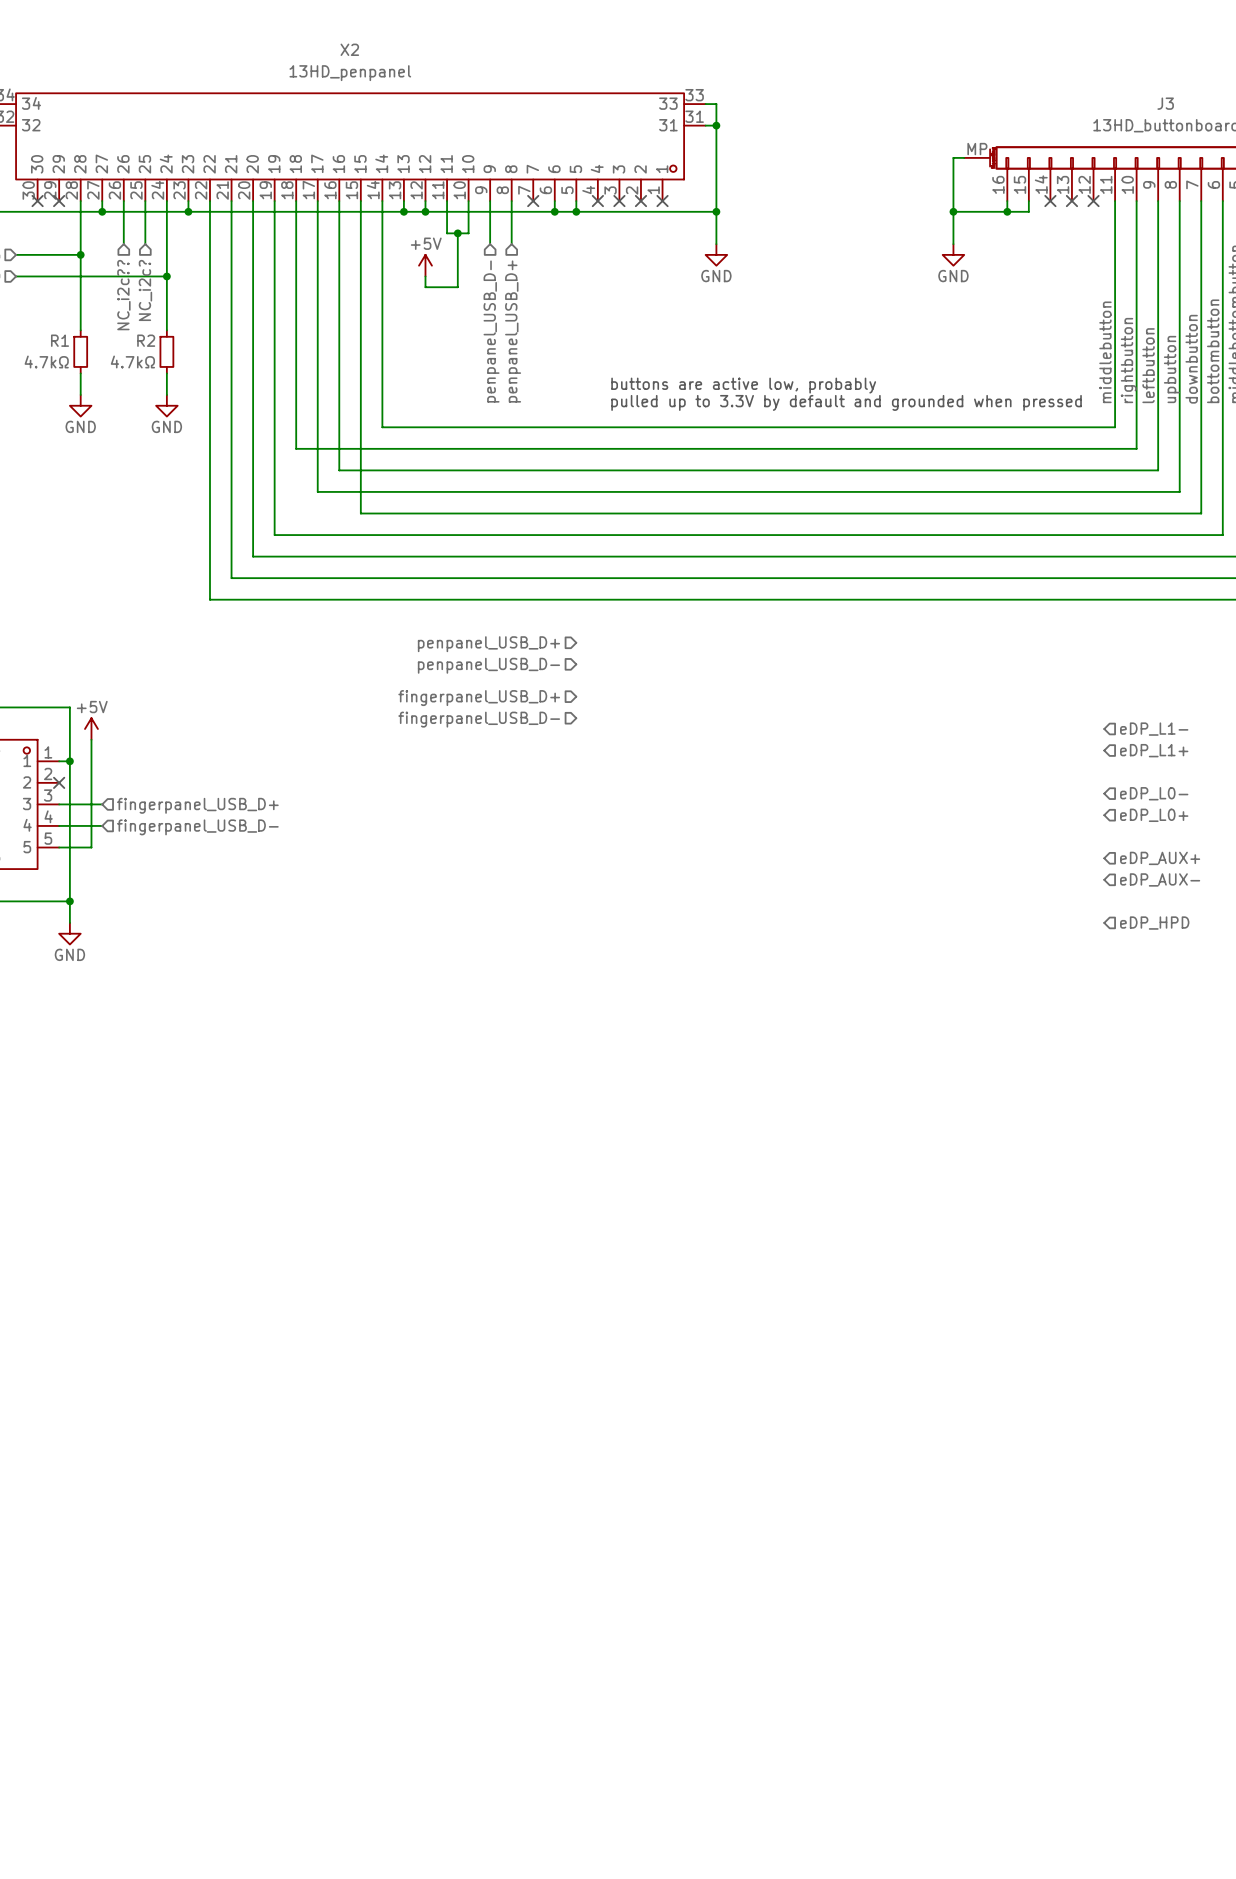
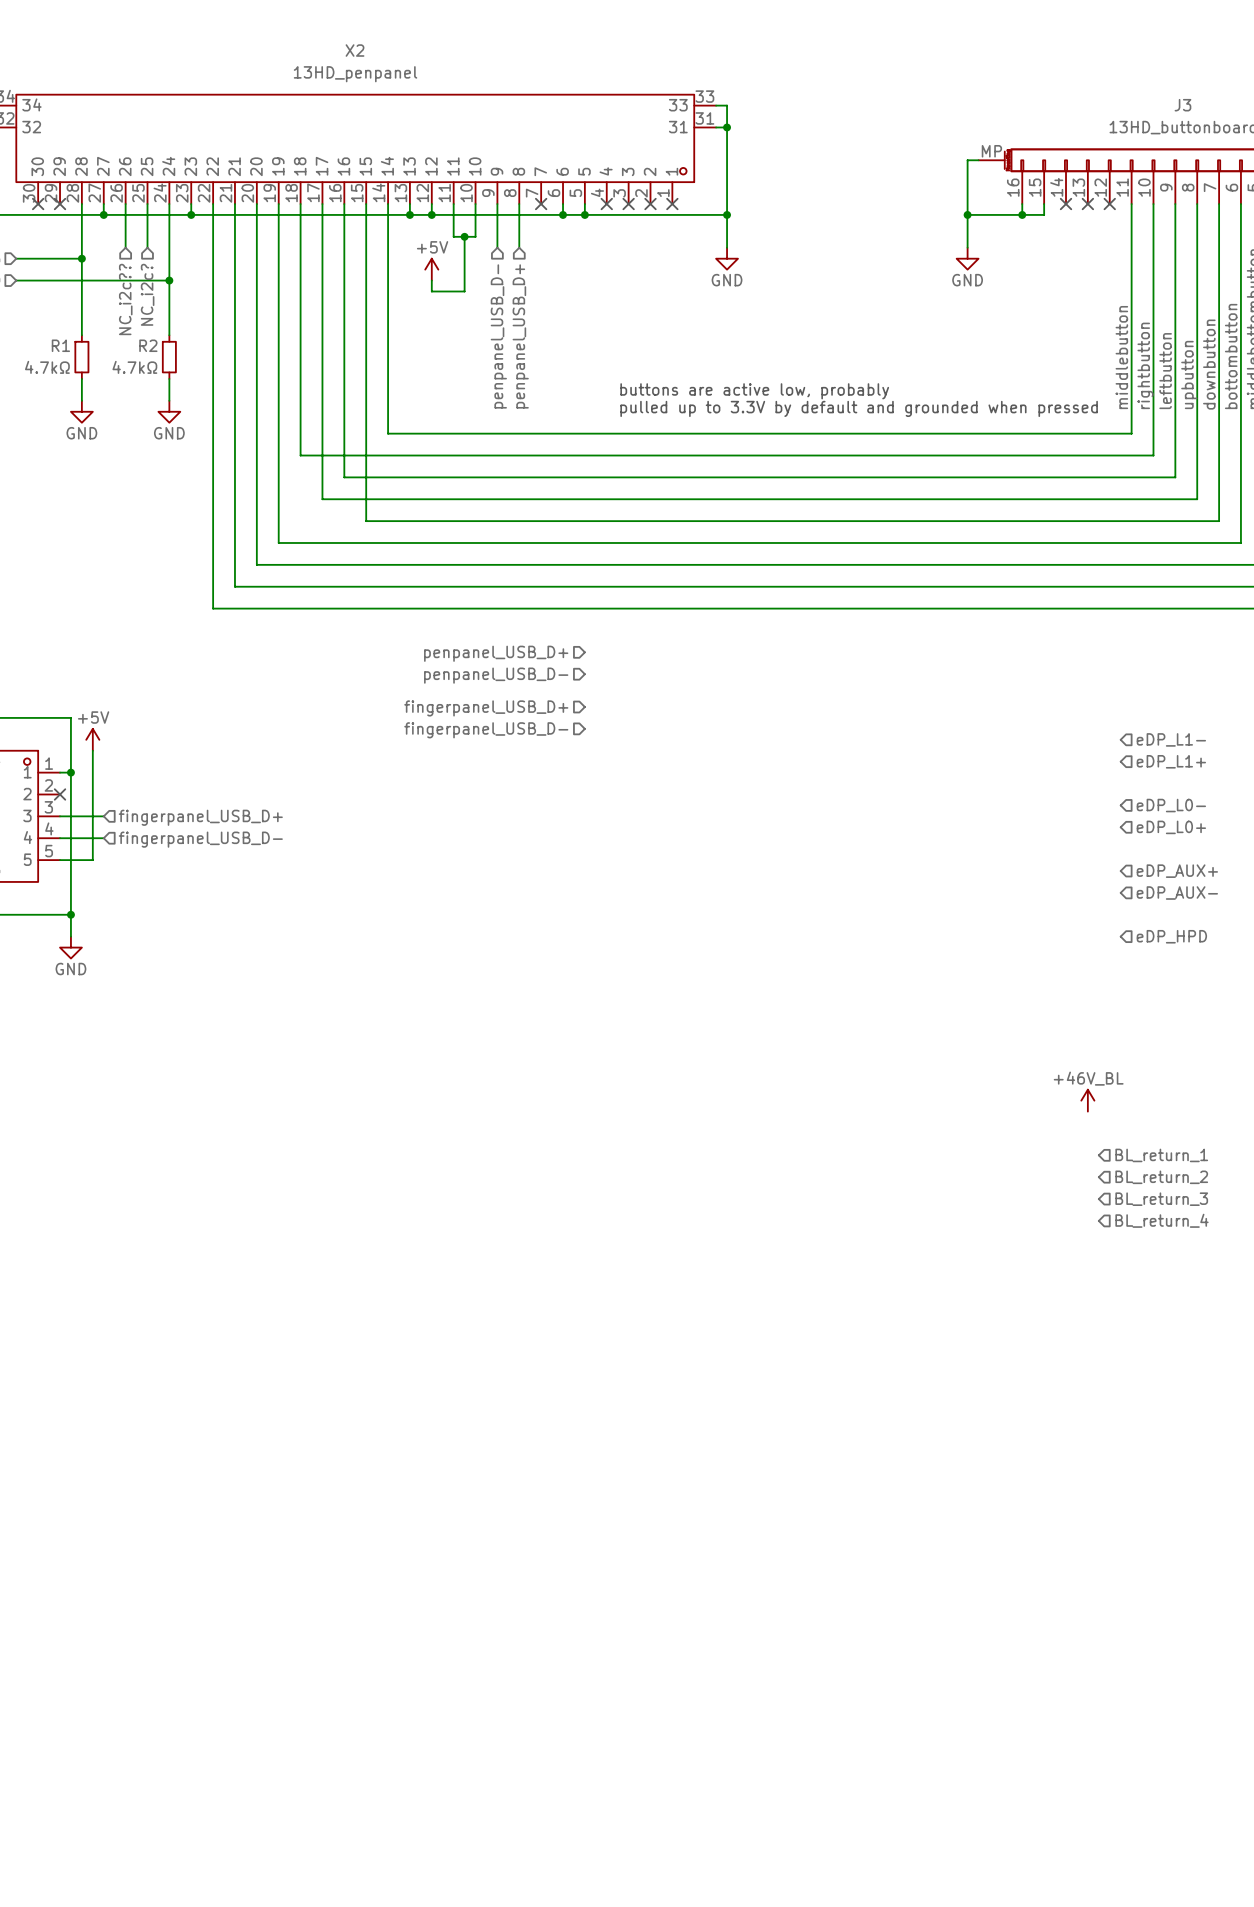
power symbol: none -> +46V_BL (1087, 1100)
hierarchical label: none -> BL_return_1 (1161, 1155)
hierarchical label: none -> BL_return_2 (1161, 1177)
hierarchical label: none -> BL_return_3 (1161, 1199)
hierarchical label: none -> BL_return_4 (1161, 1220)

